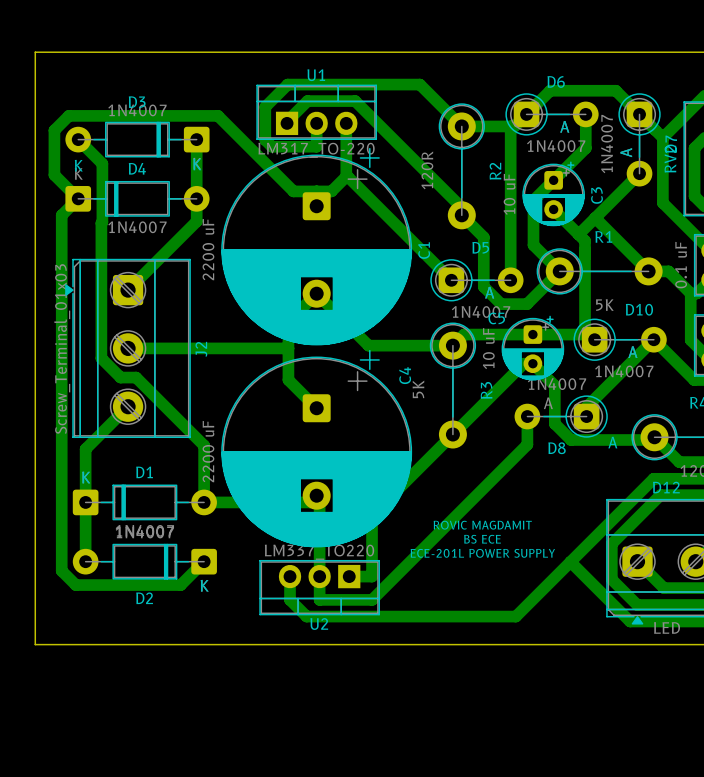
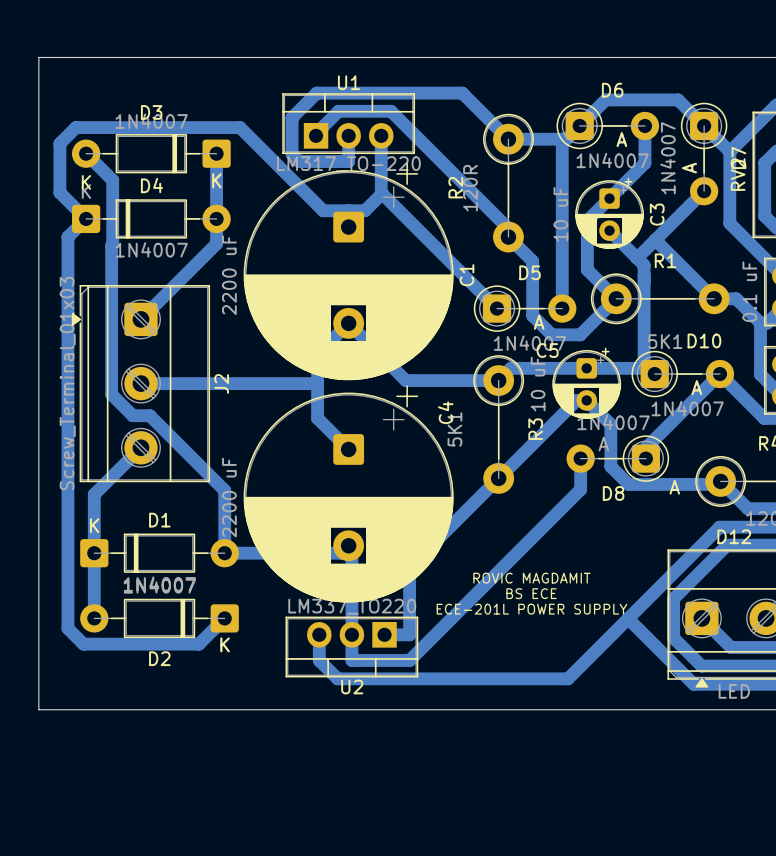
R2 name position: R2 (495, 171) -> R2 (455, 187)
R1 value: 5K (604, 305) -> 5K1 (665, 341)
R3 value: 5K (418, 389) -> 5K1 (454, 429)

